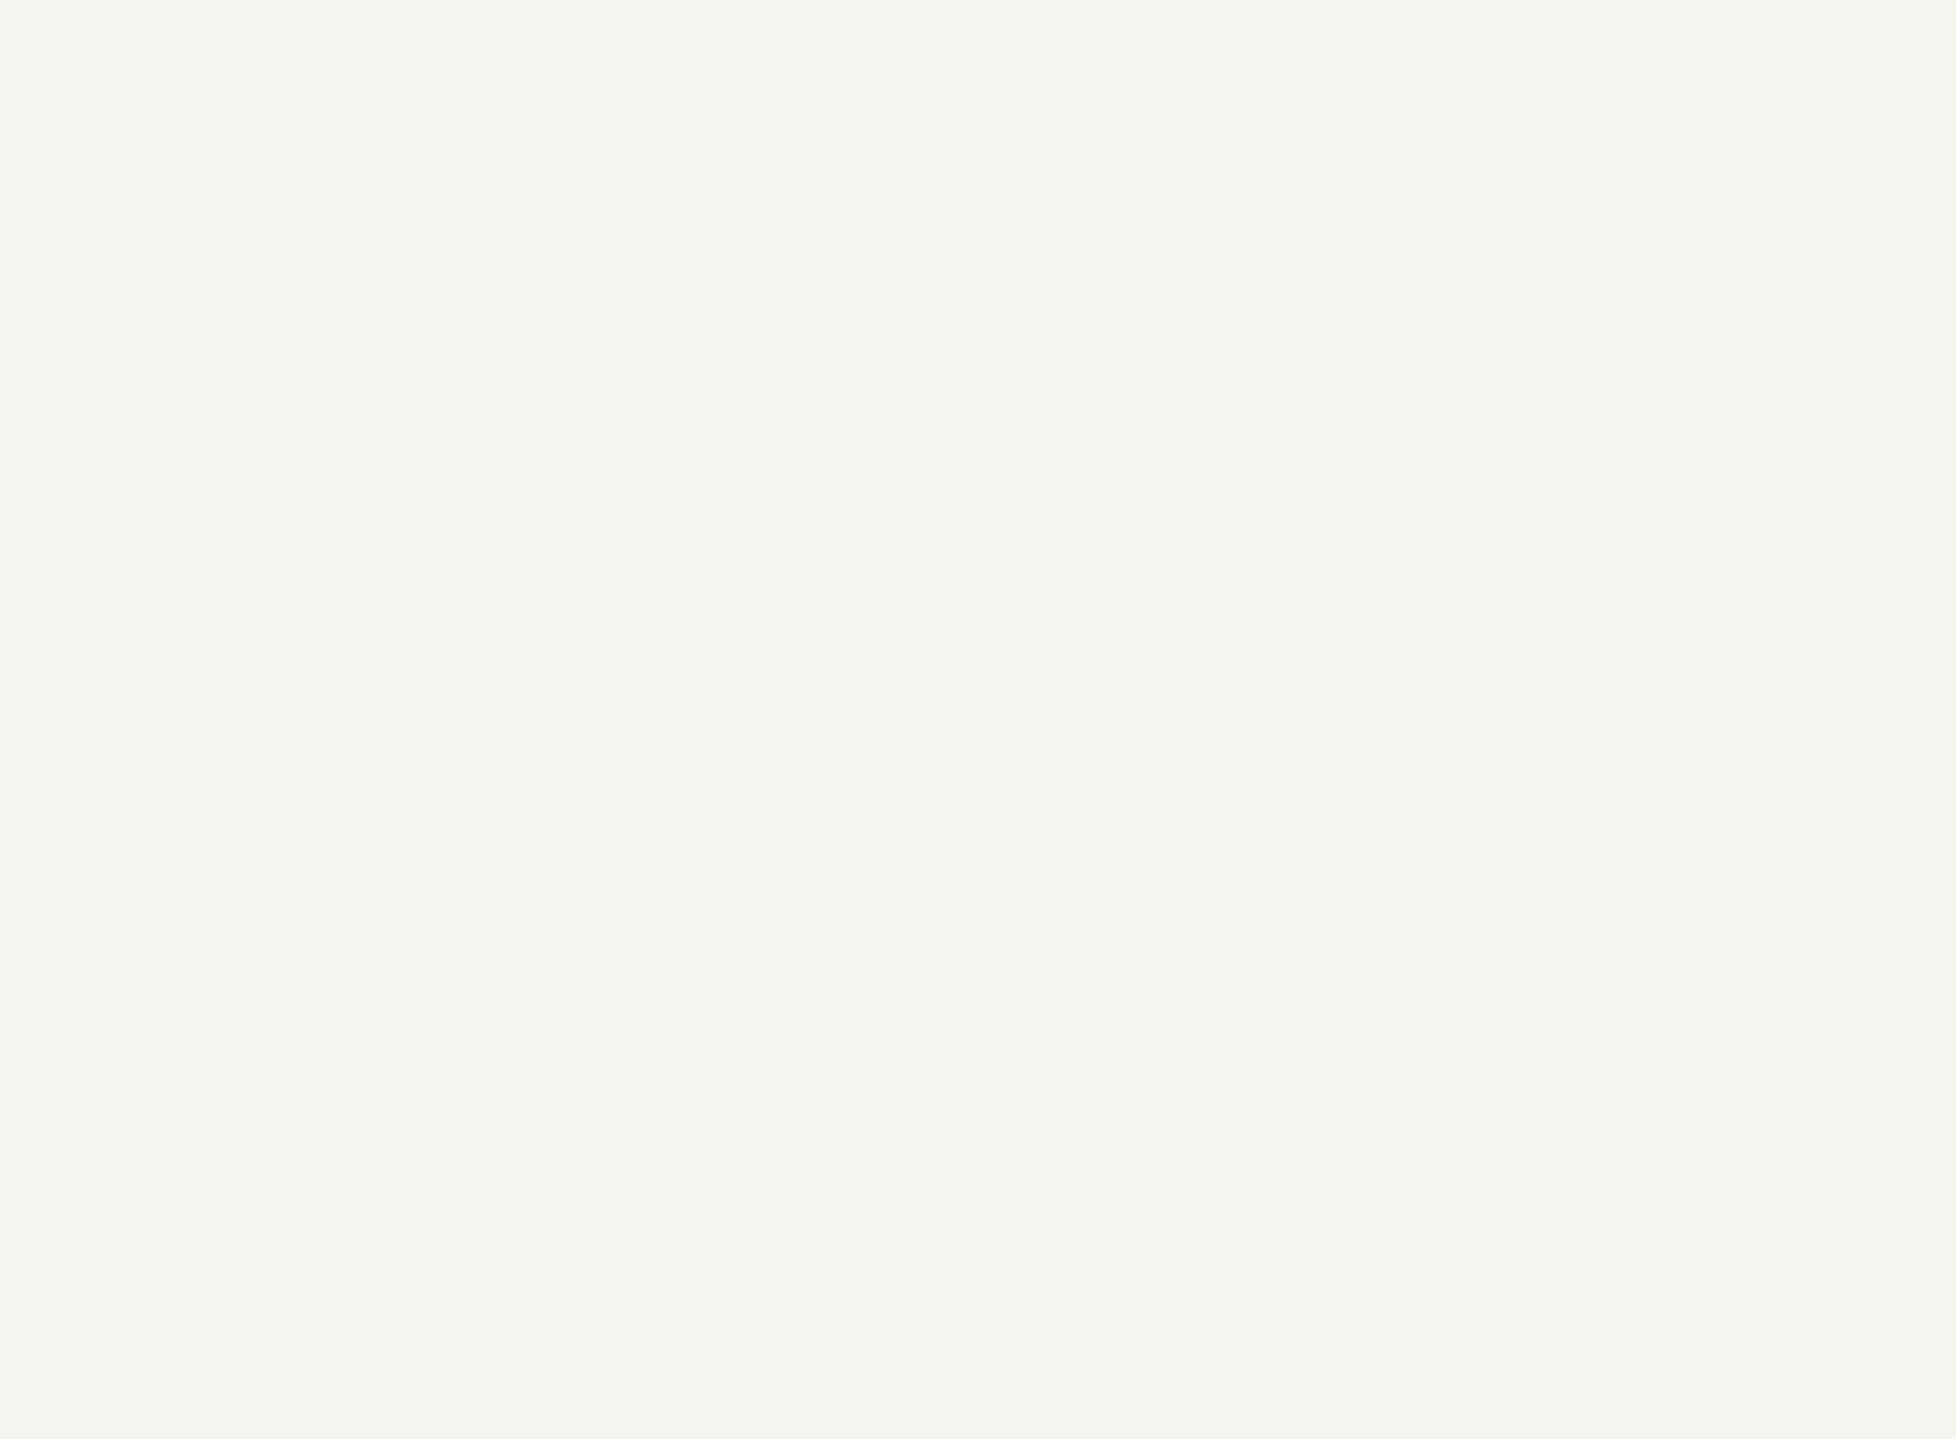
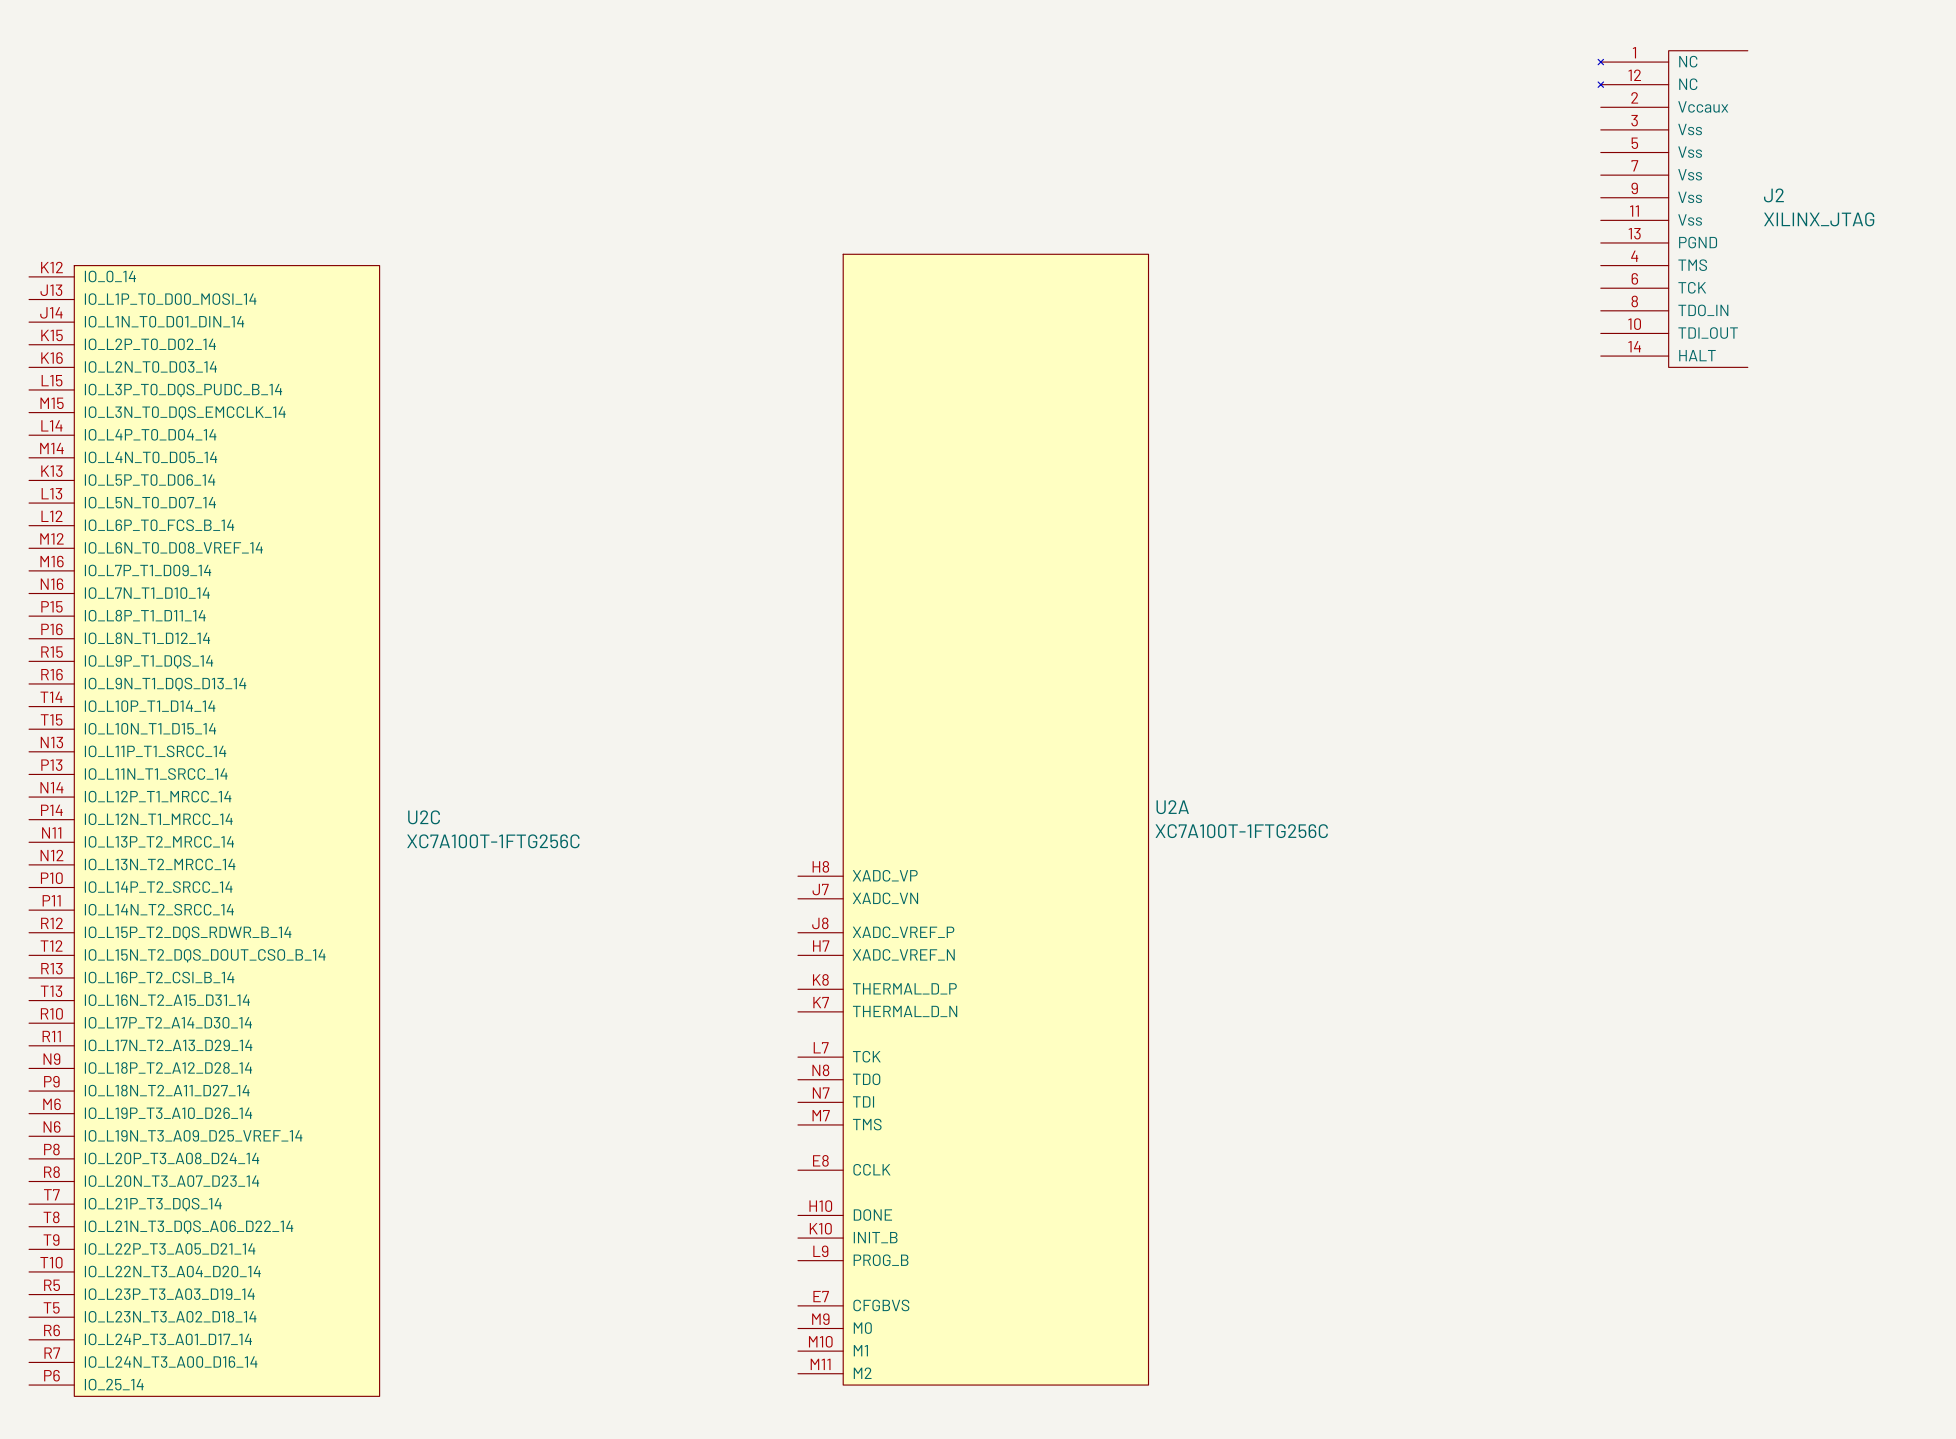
J2: none -> XILINX_JTAG (1672, 209)
U2A: none -> XC7A100T-1FTG256C (973, 819)
U2C: none -> XC7A100T-1FTG256C (204, 830)

